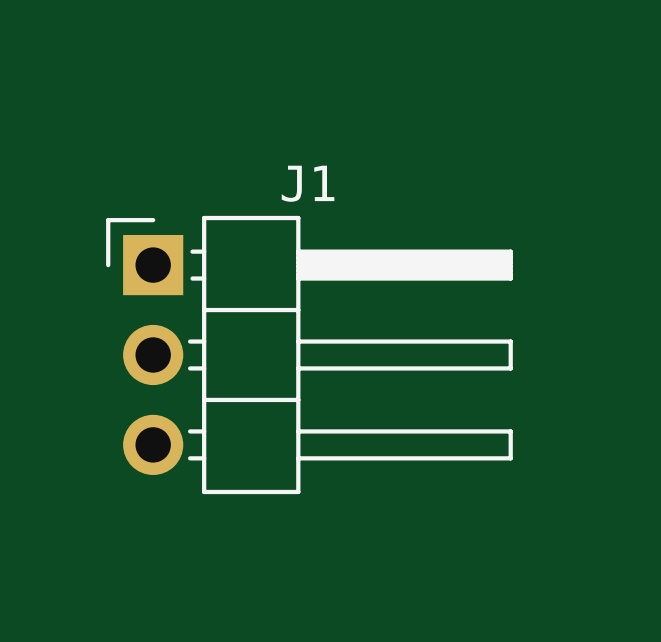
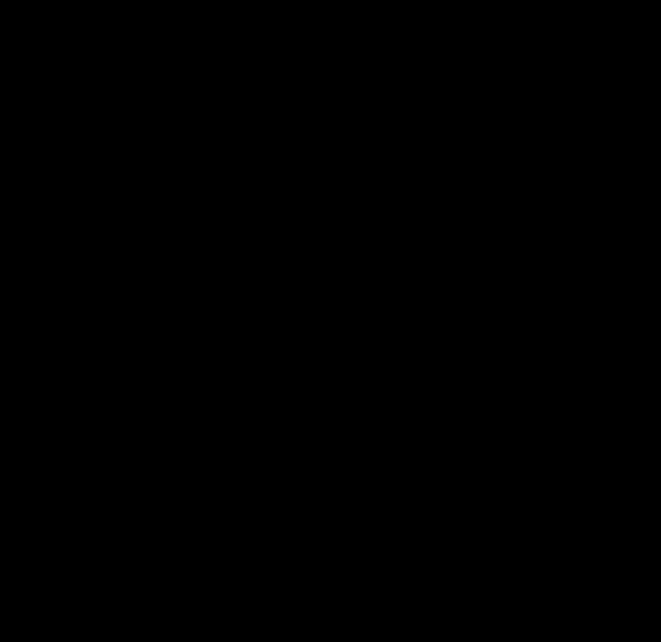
J1: (309, 354) -> none

